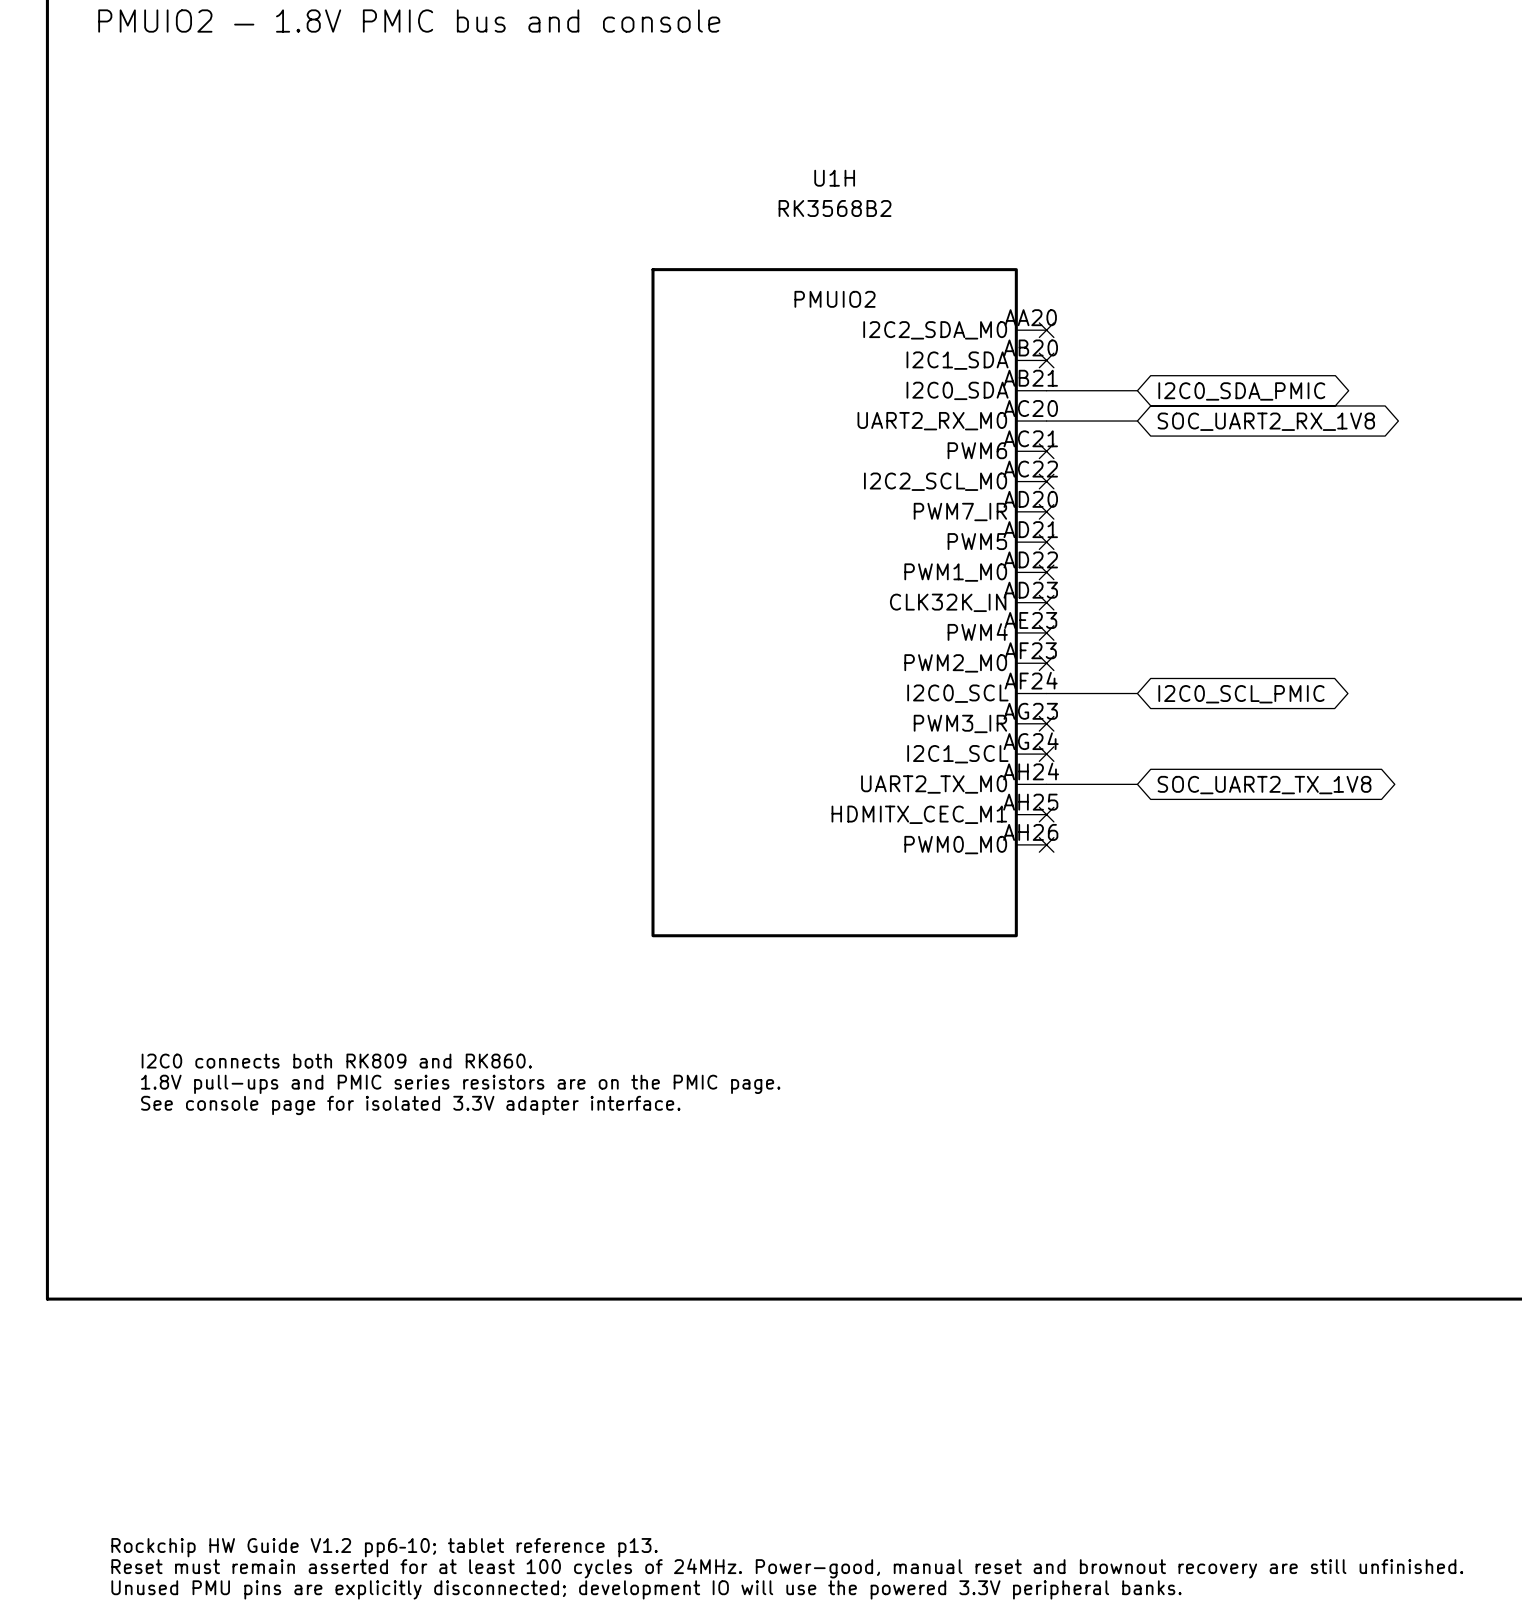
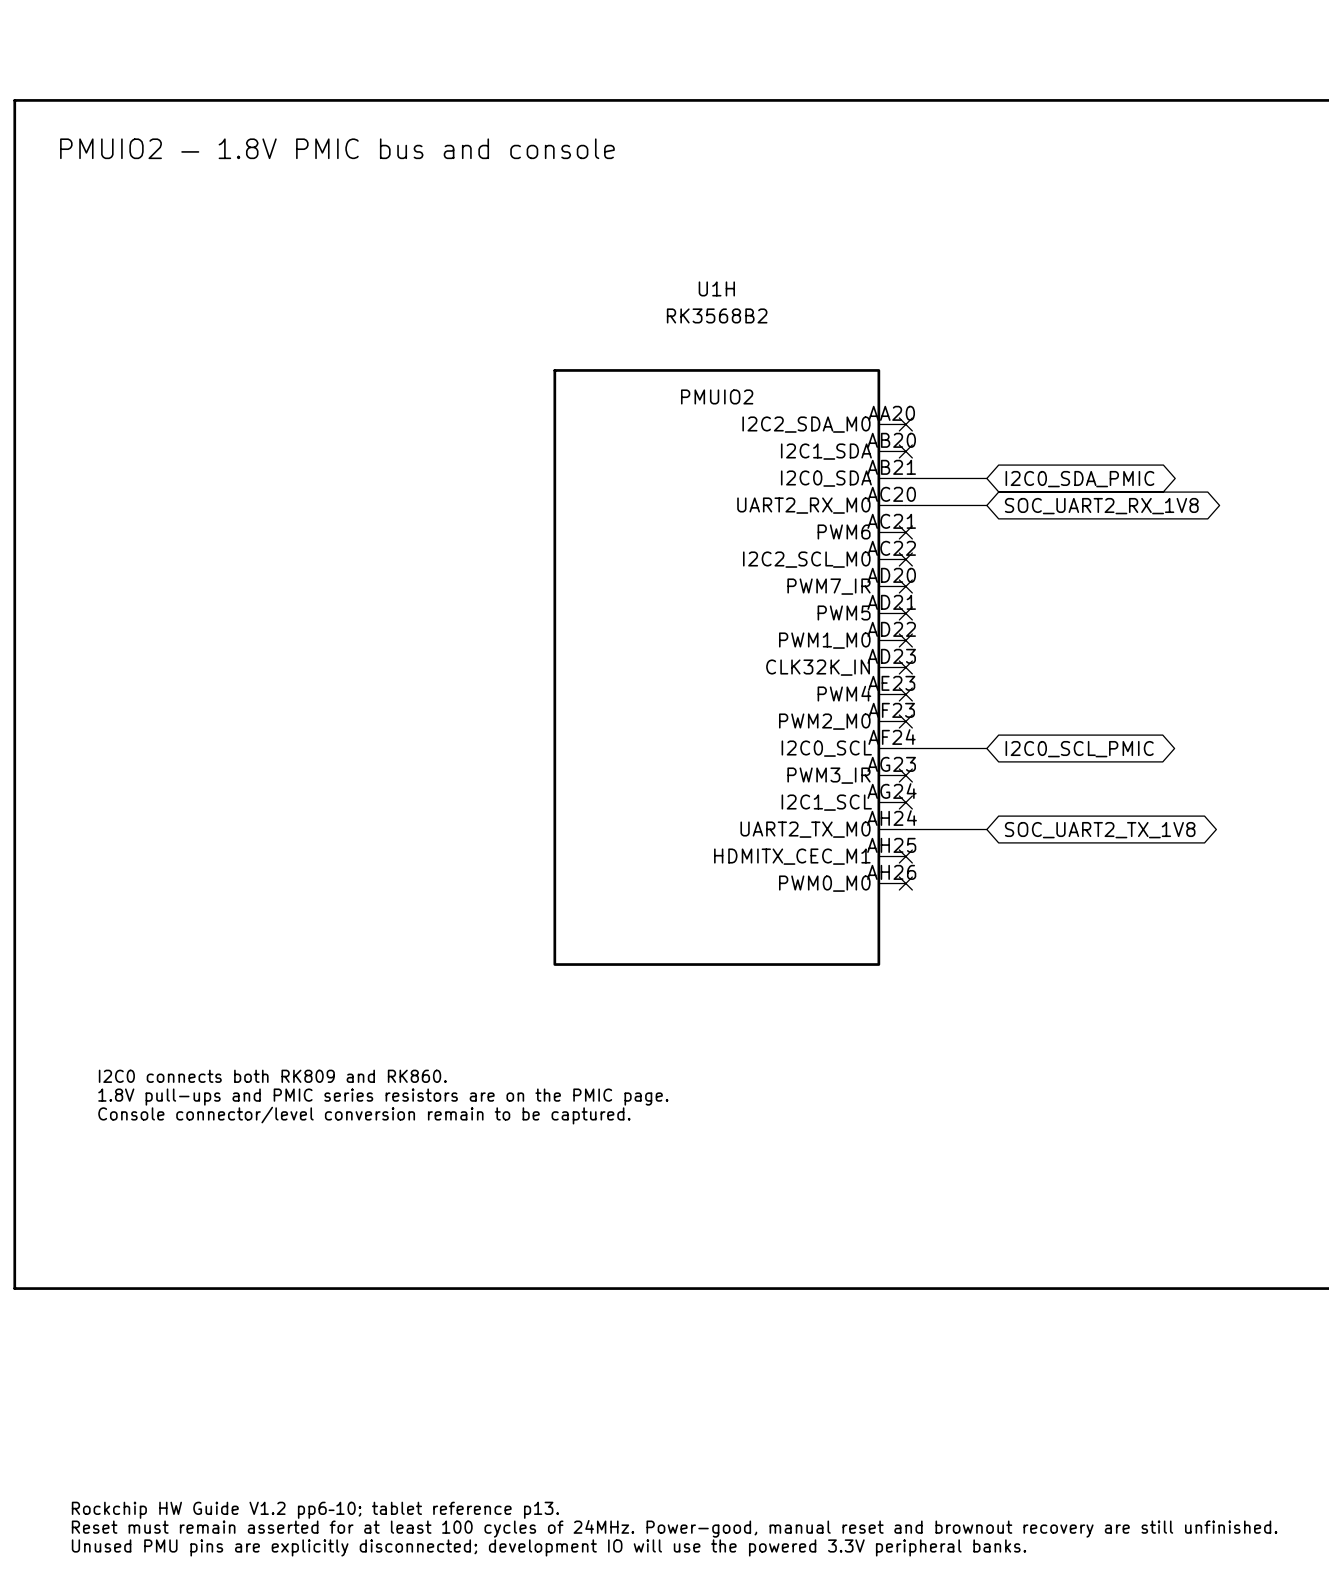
text: See console page for isolated 3.3V adapter interface. (410, 1105) -> Console connector/level conversion remain to be captured. (364, 1115)

